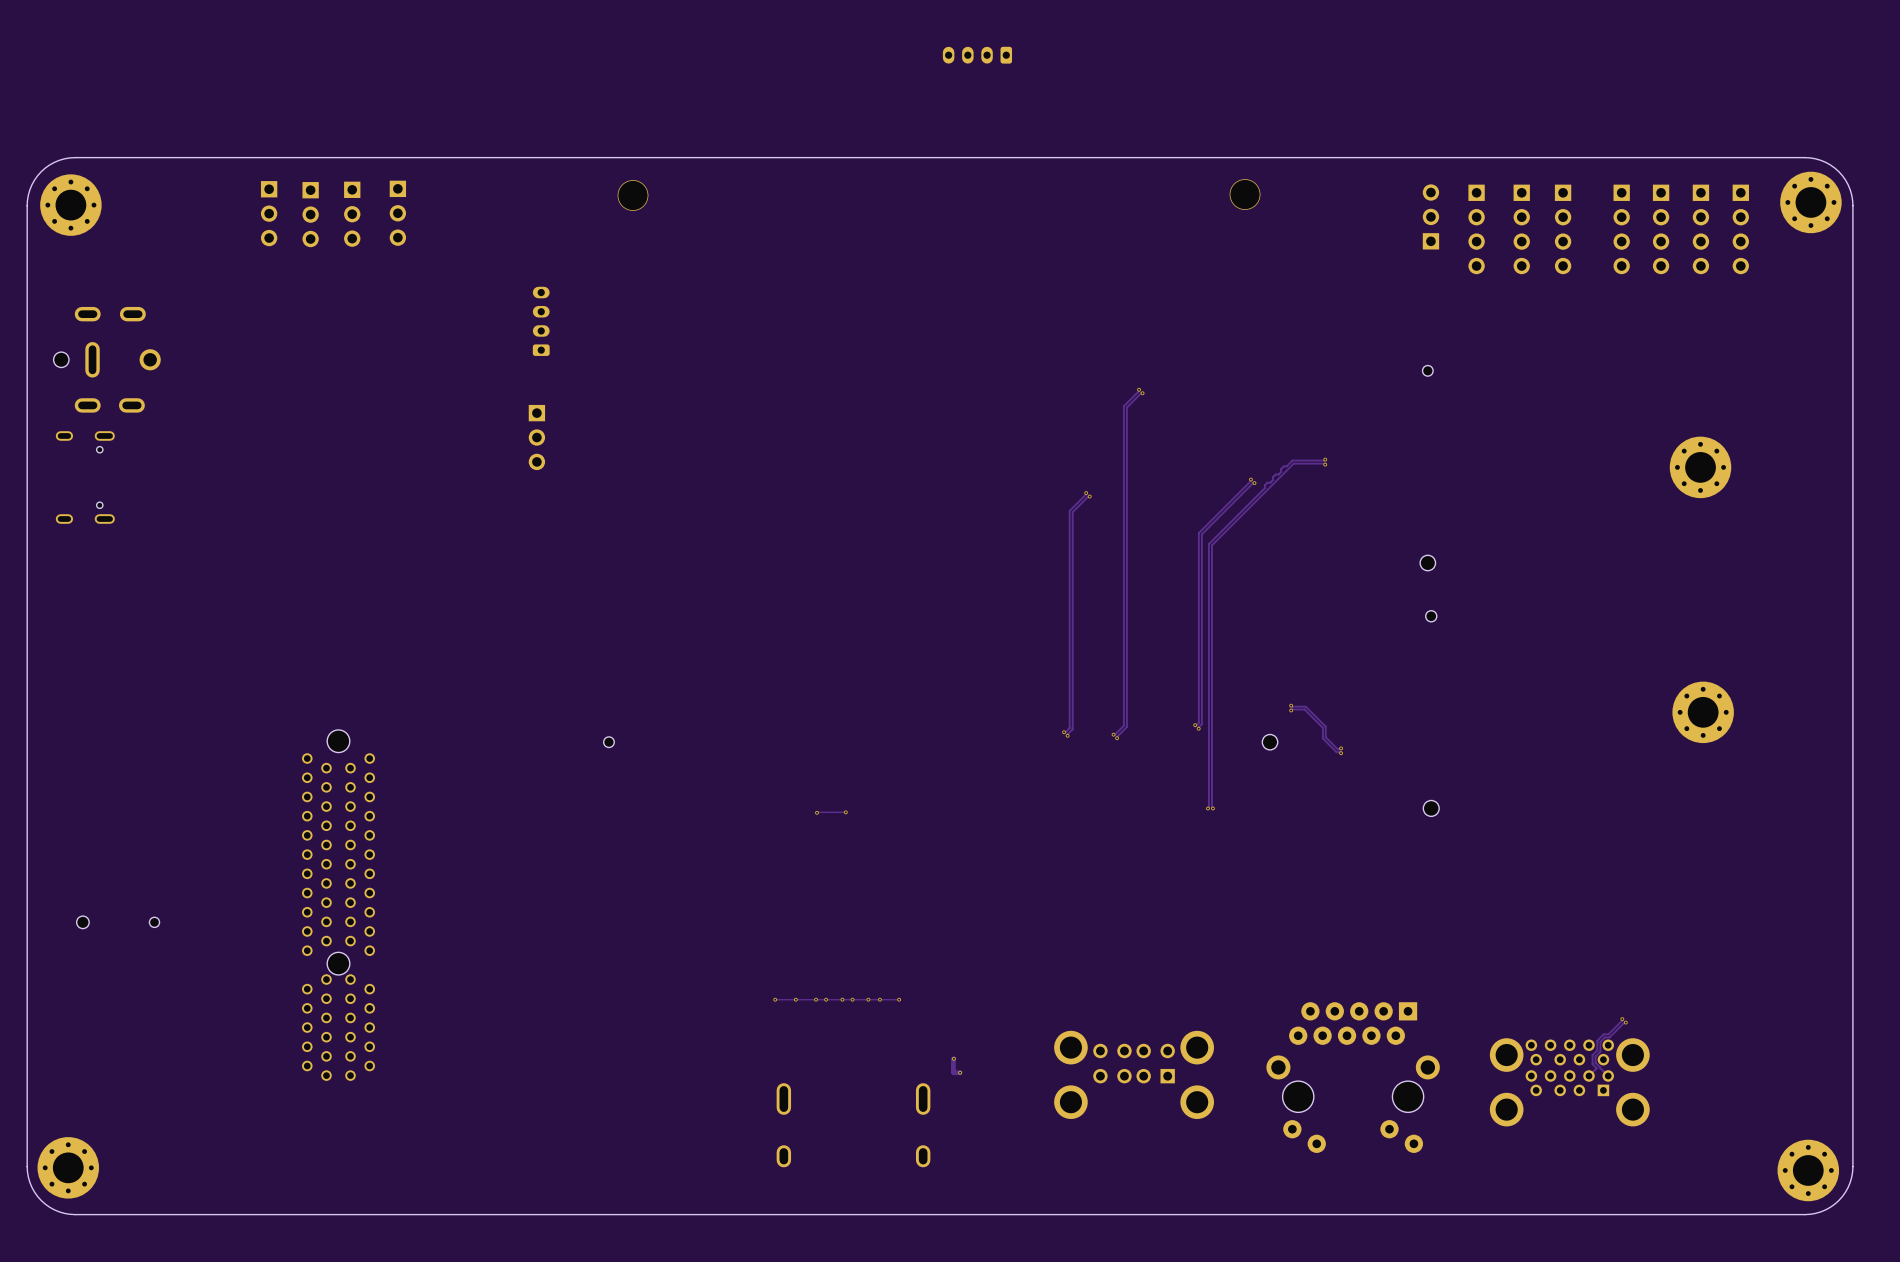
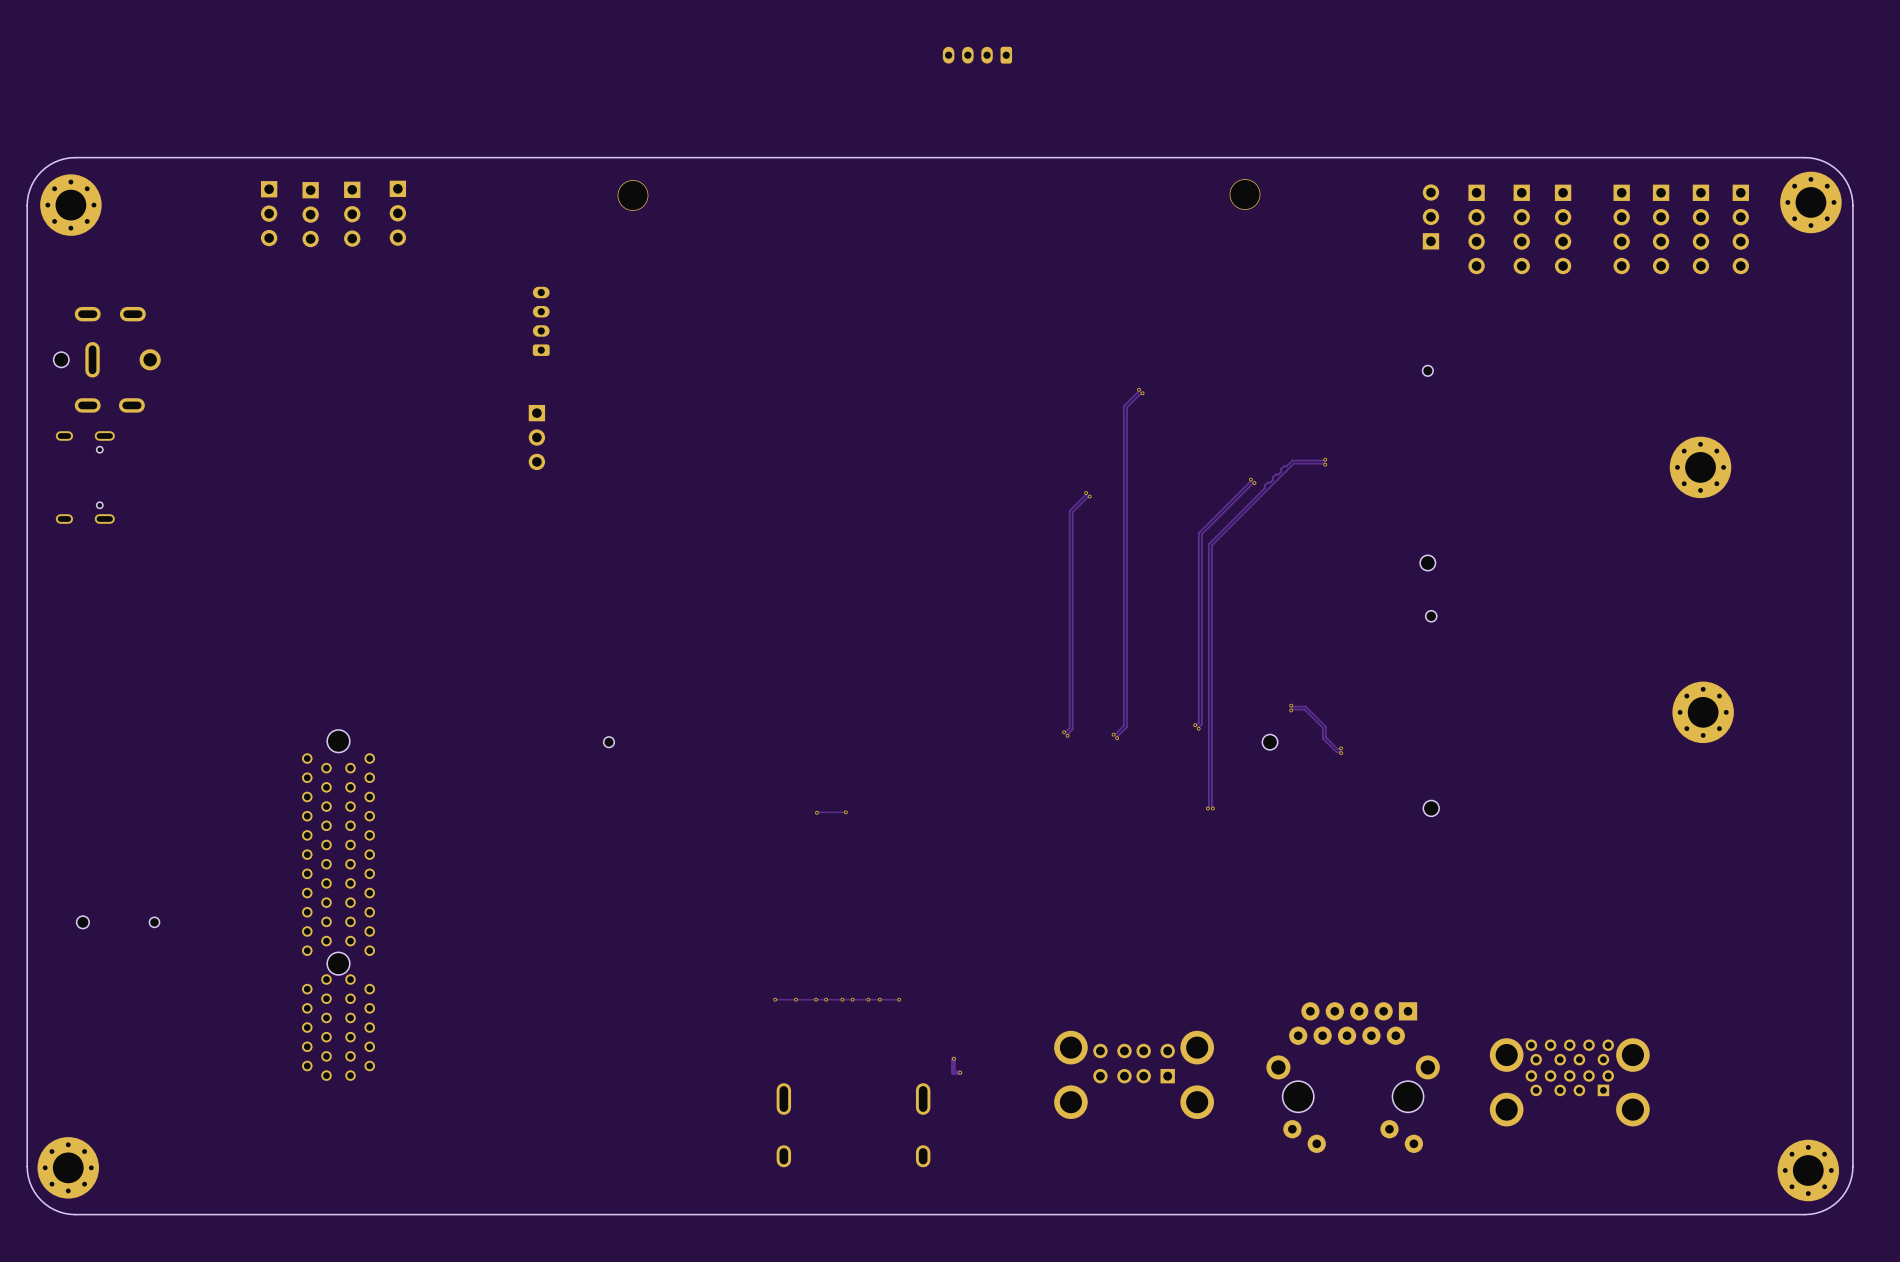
track: (1622, 1019) (1608, 1034) (1603, 1034) (1597, 1040) (1597, 1050) (1592, 1055) (1592, 1064) (1596, 1068) (1589, 1075) -> none
via: (1622, 1019) -> none
track: (1625, 1022) (1609, 1037) (1604, 1037) (1600, 1041) (1600, 1051) (1595, 1056) (1595, 1062) (1608, 1075) -> none
via: (1625, 1022) -> none

